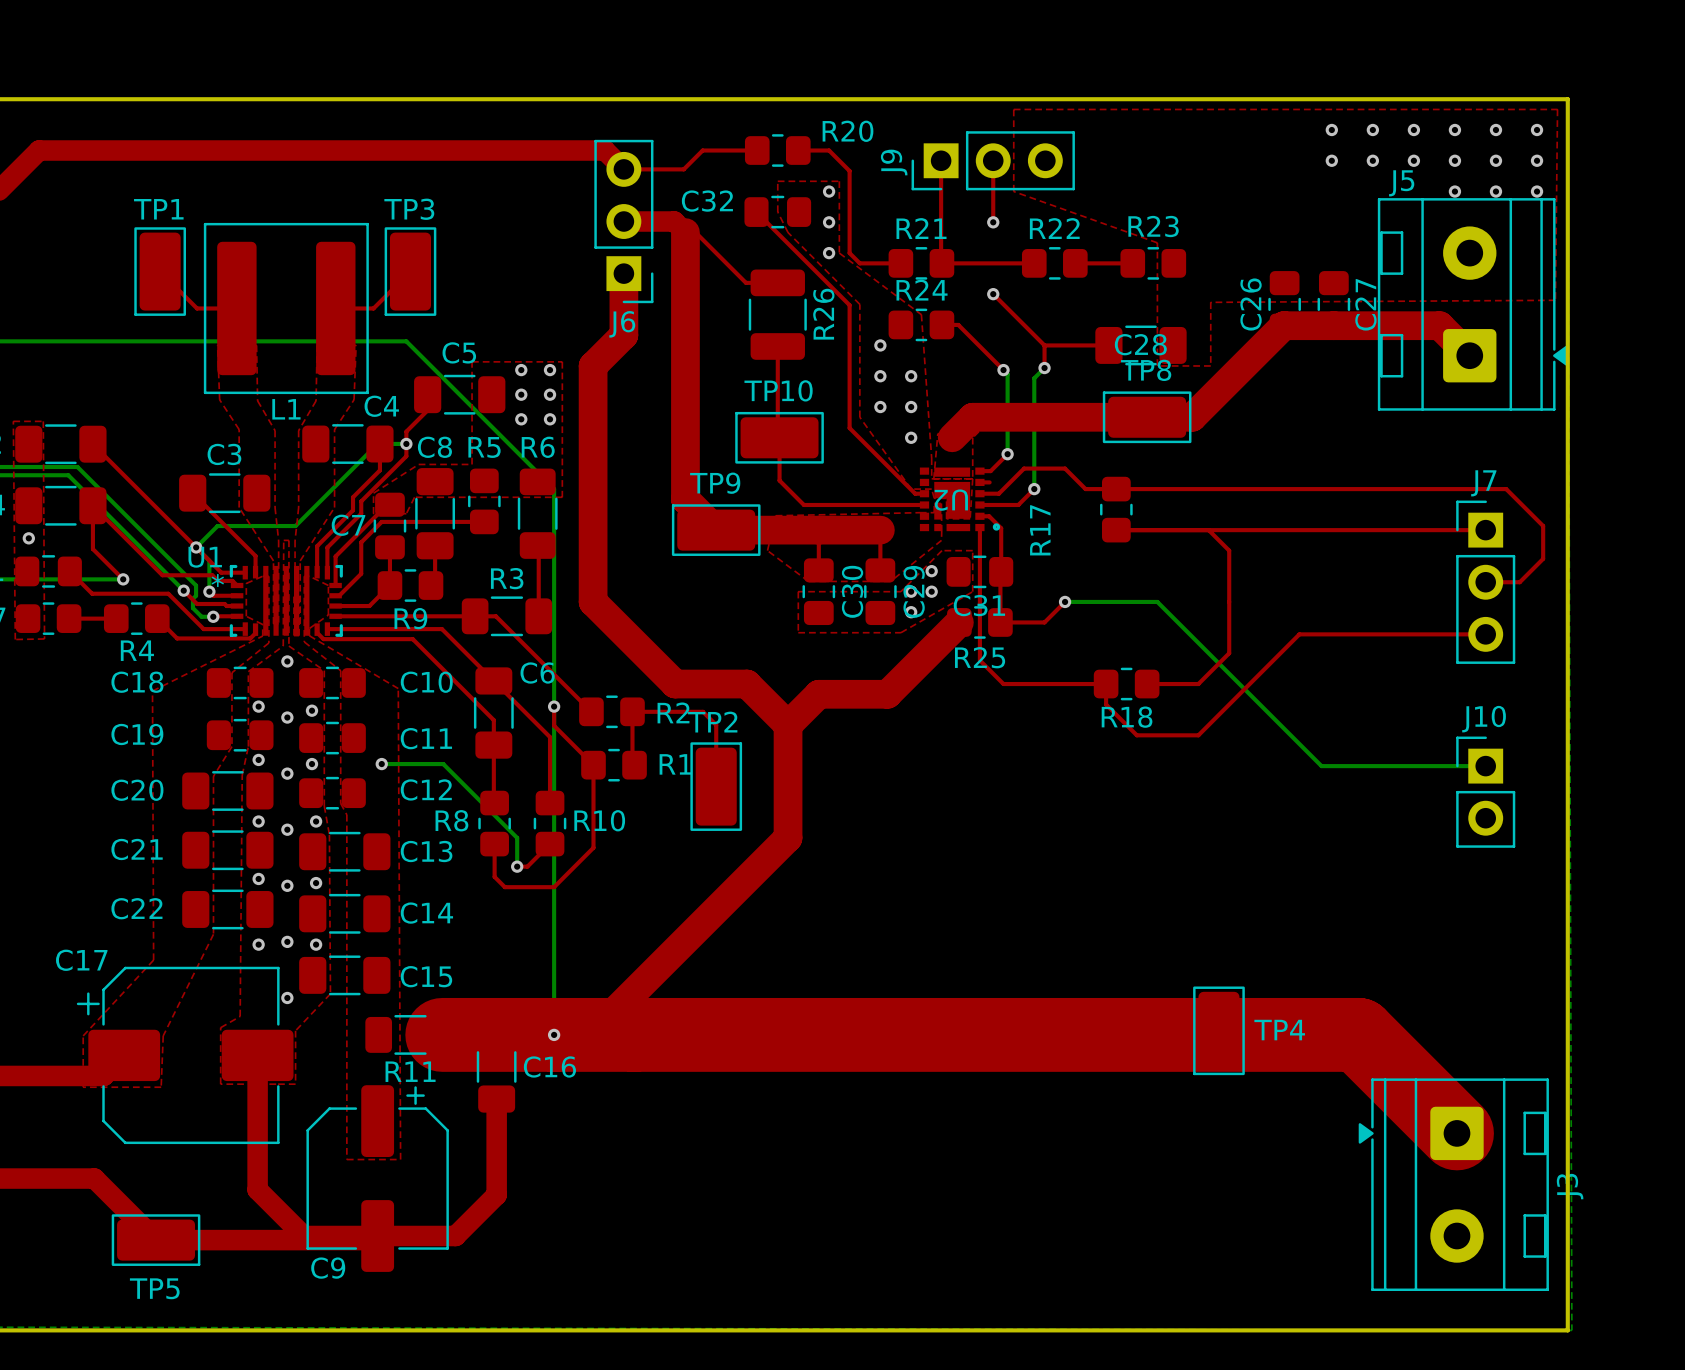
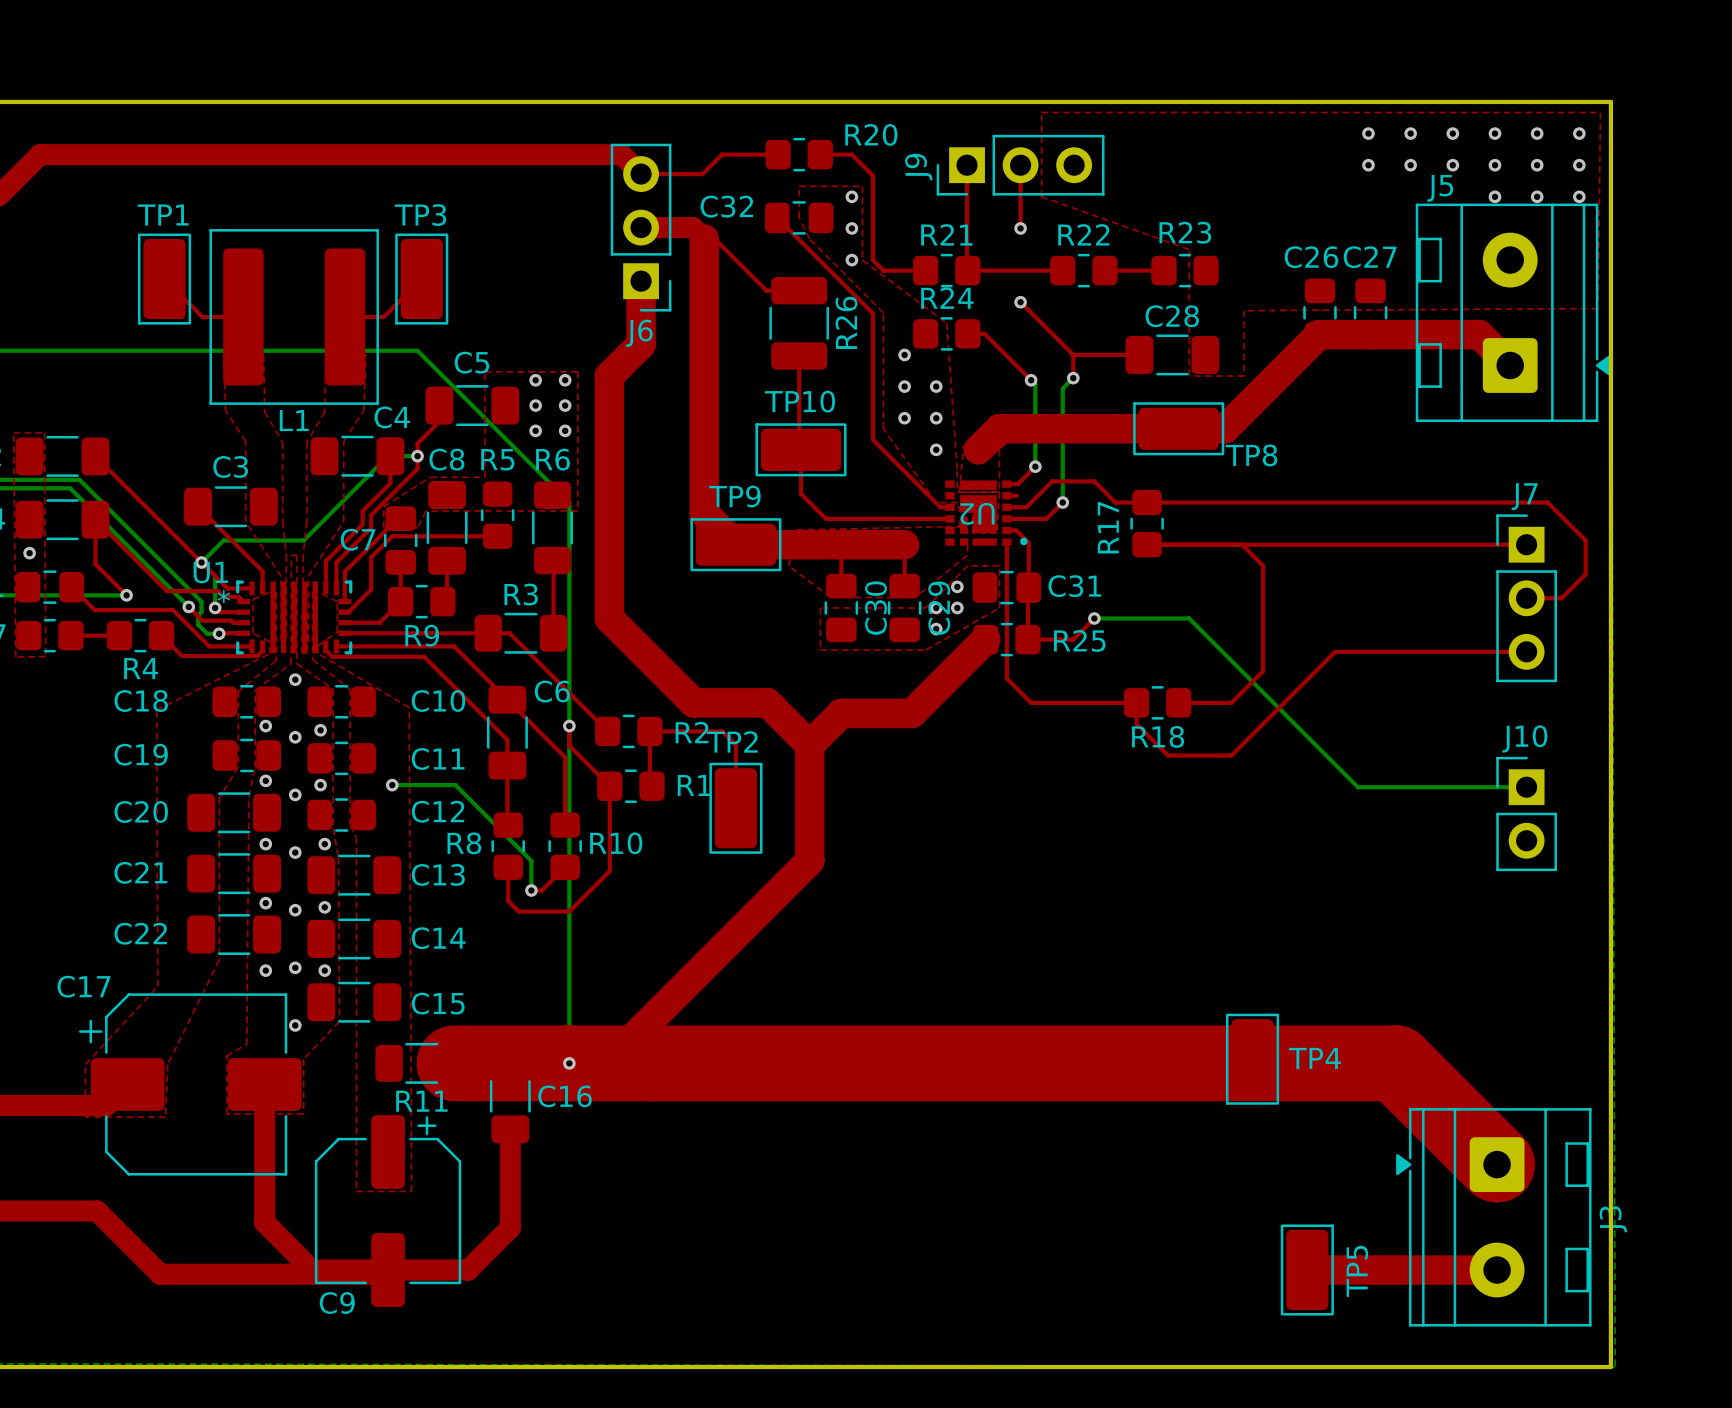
C26 name rotation: 0° (1251, 304) -> 90° clockwise (1311, 257)
C27 name rotation: 0° (1365, 304) -> 90° clockwise (1370, 257)
C28 name position: C28 (1140, 344) -> C28 (1172, 316)
TP8 name position: TP8 (1146, 370) -> TP8 (1251, 455)
R17 name position: R17 (1040, 530) -> R17 (1108, 527)
C31 name position: C31 (979, 605) -> C31 (1074, 586)
R25 name position: R25 (980, 657) -> R25 (1079, 640)
top track: none -> (1307, 1270) (1497, 1270)
TP5 rotation: 0° (156, 1240) -> 90° clockwise (1307, 1270)
TP5 position: (156, 1240) -> (1307, 1270)
TP5 name position: TP5 (154, 1288) -> TP5 (1357, 1271)

